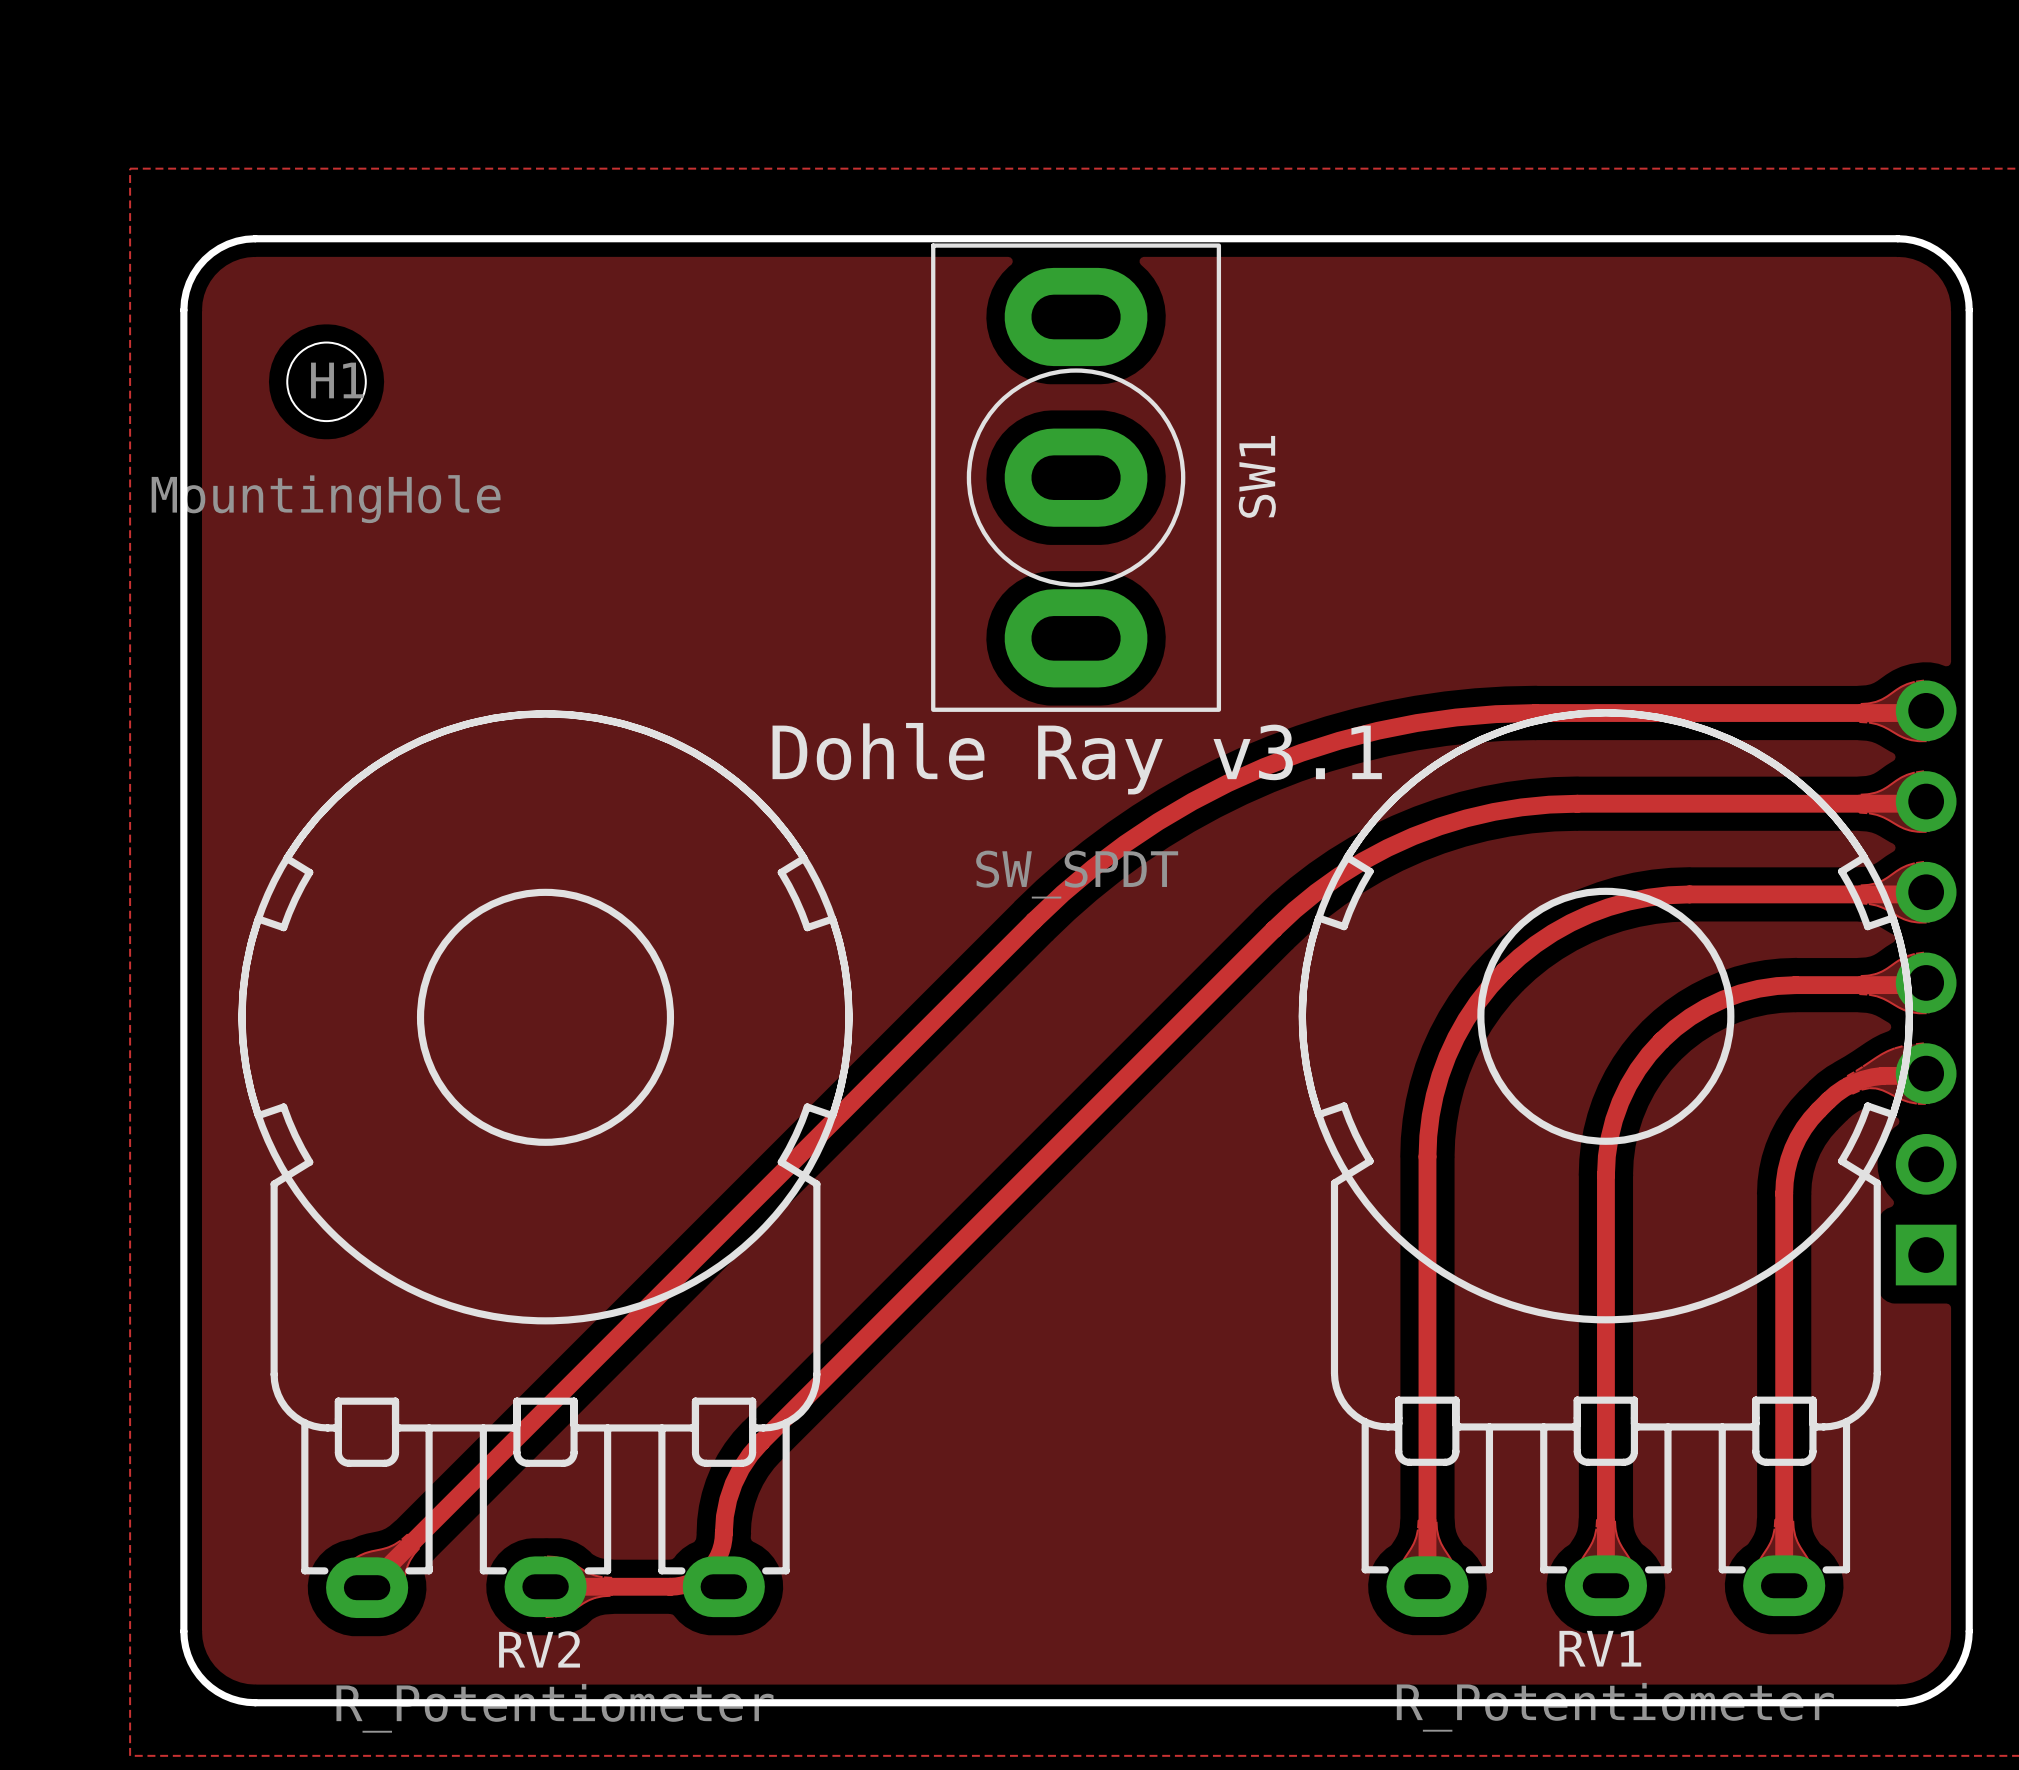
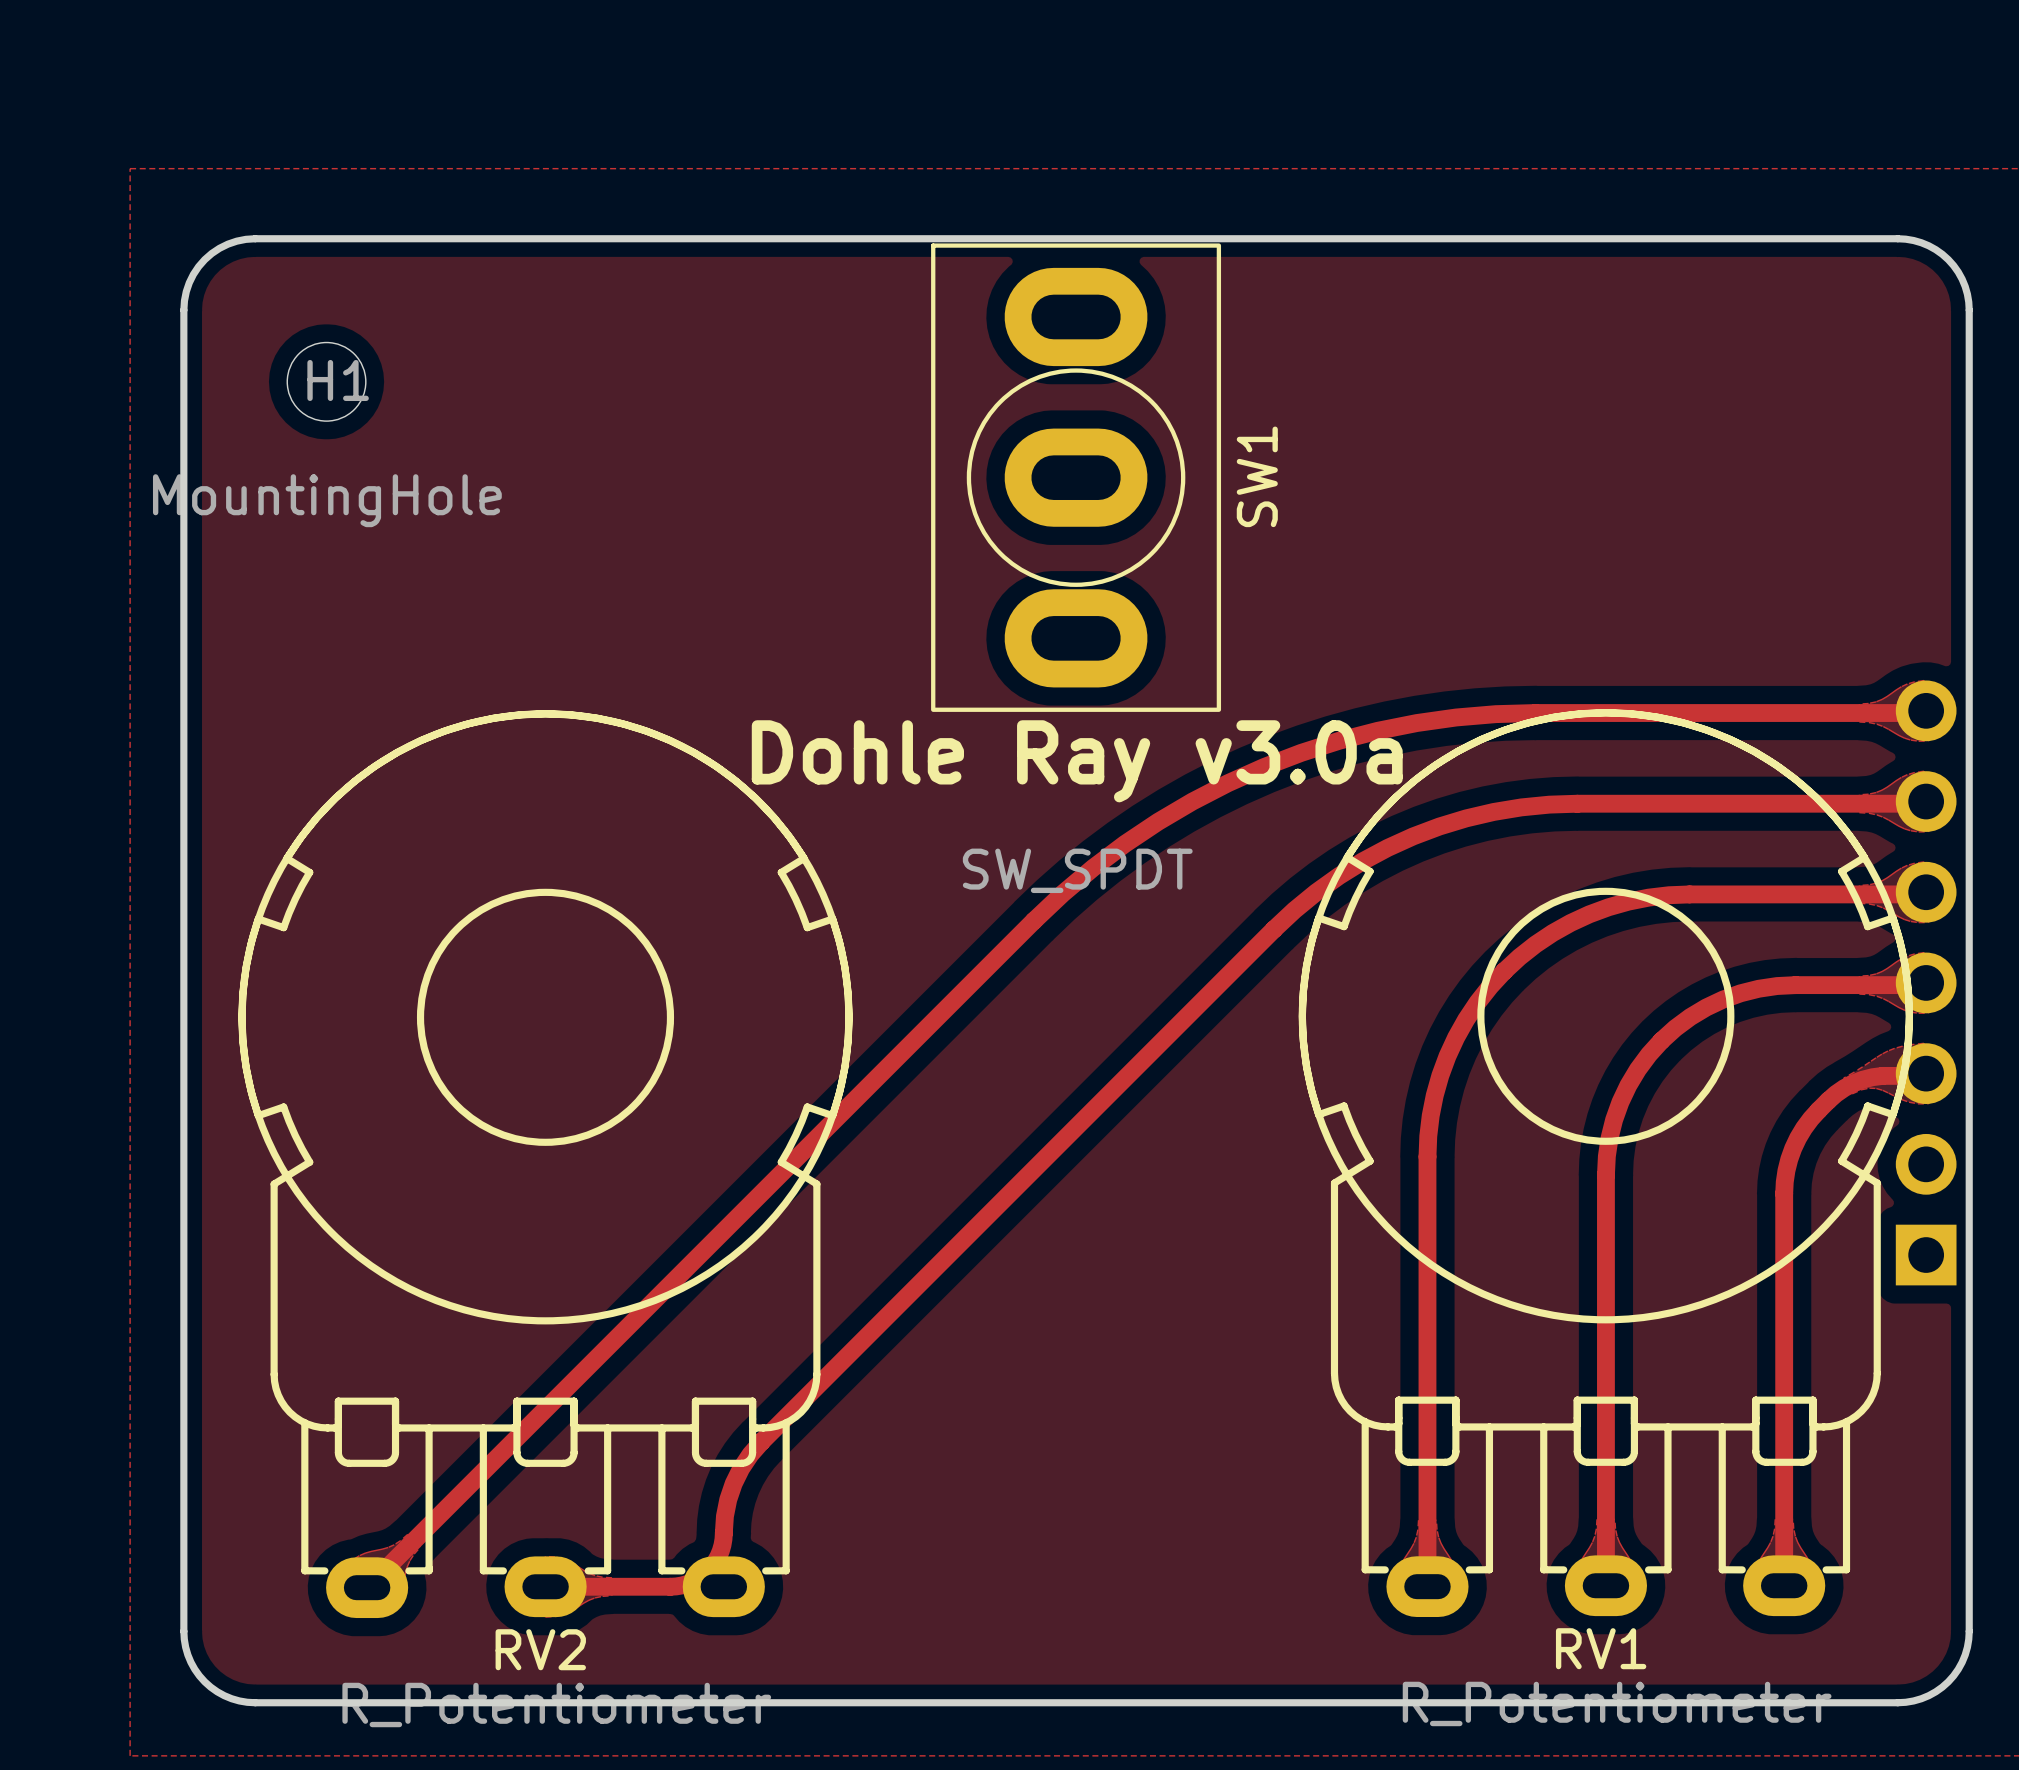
text: Dohle Ray v3.1 (1077, 758) -> Dohle Ray v3.0a (1077, 761)

